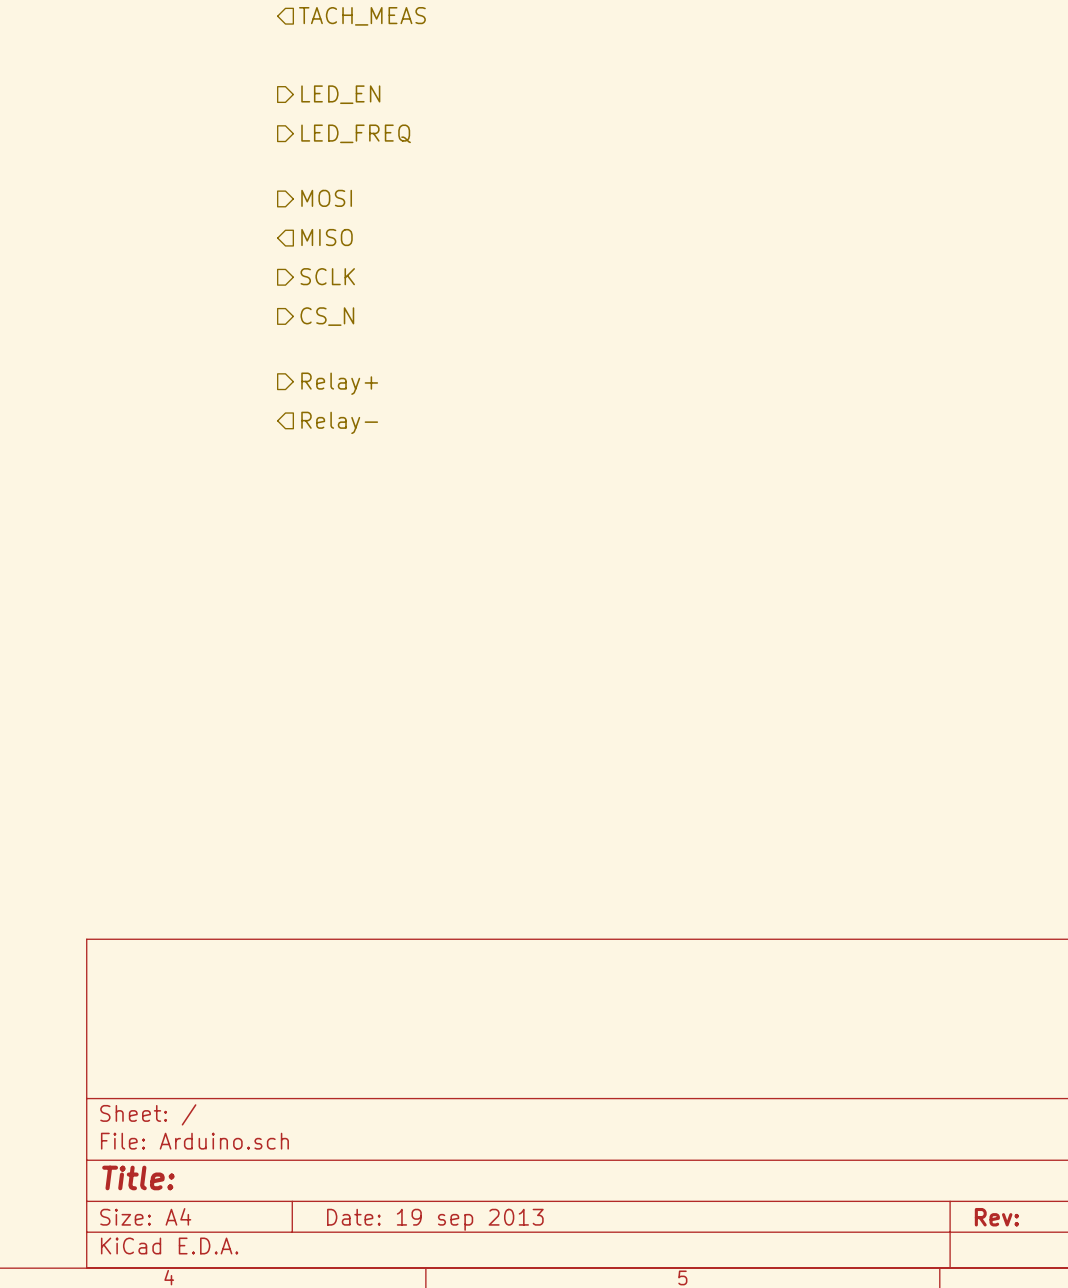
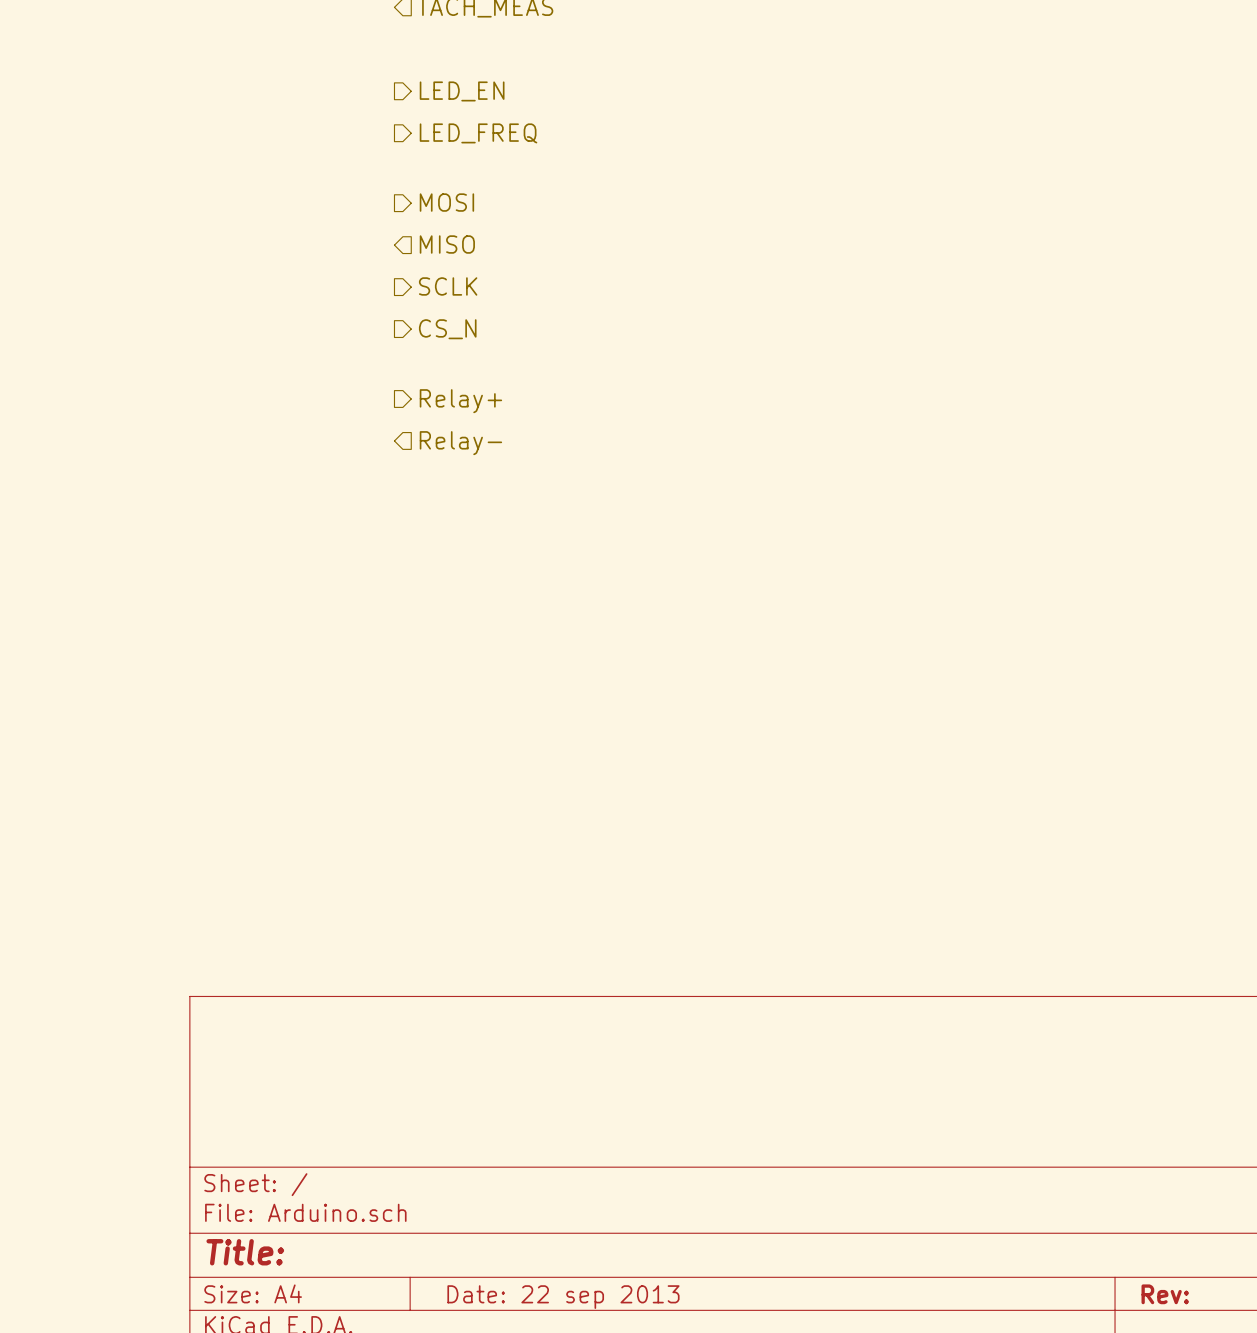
title block: Date: 19 sep 2013 (435, 1219) -> Date: 22 sep 2013 (563, 1297)

